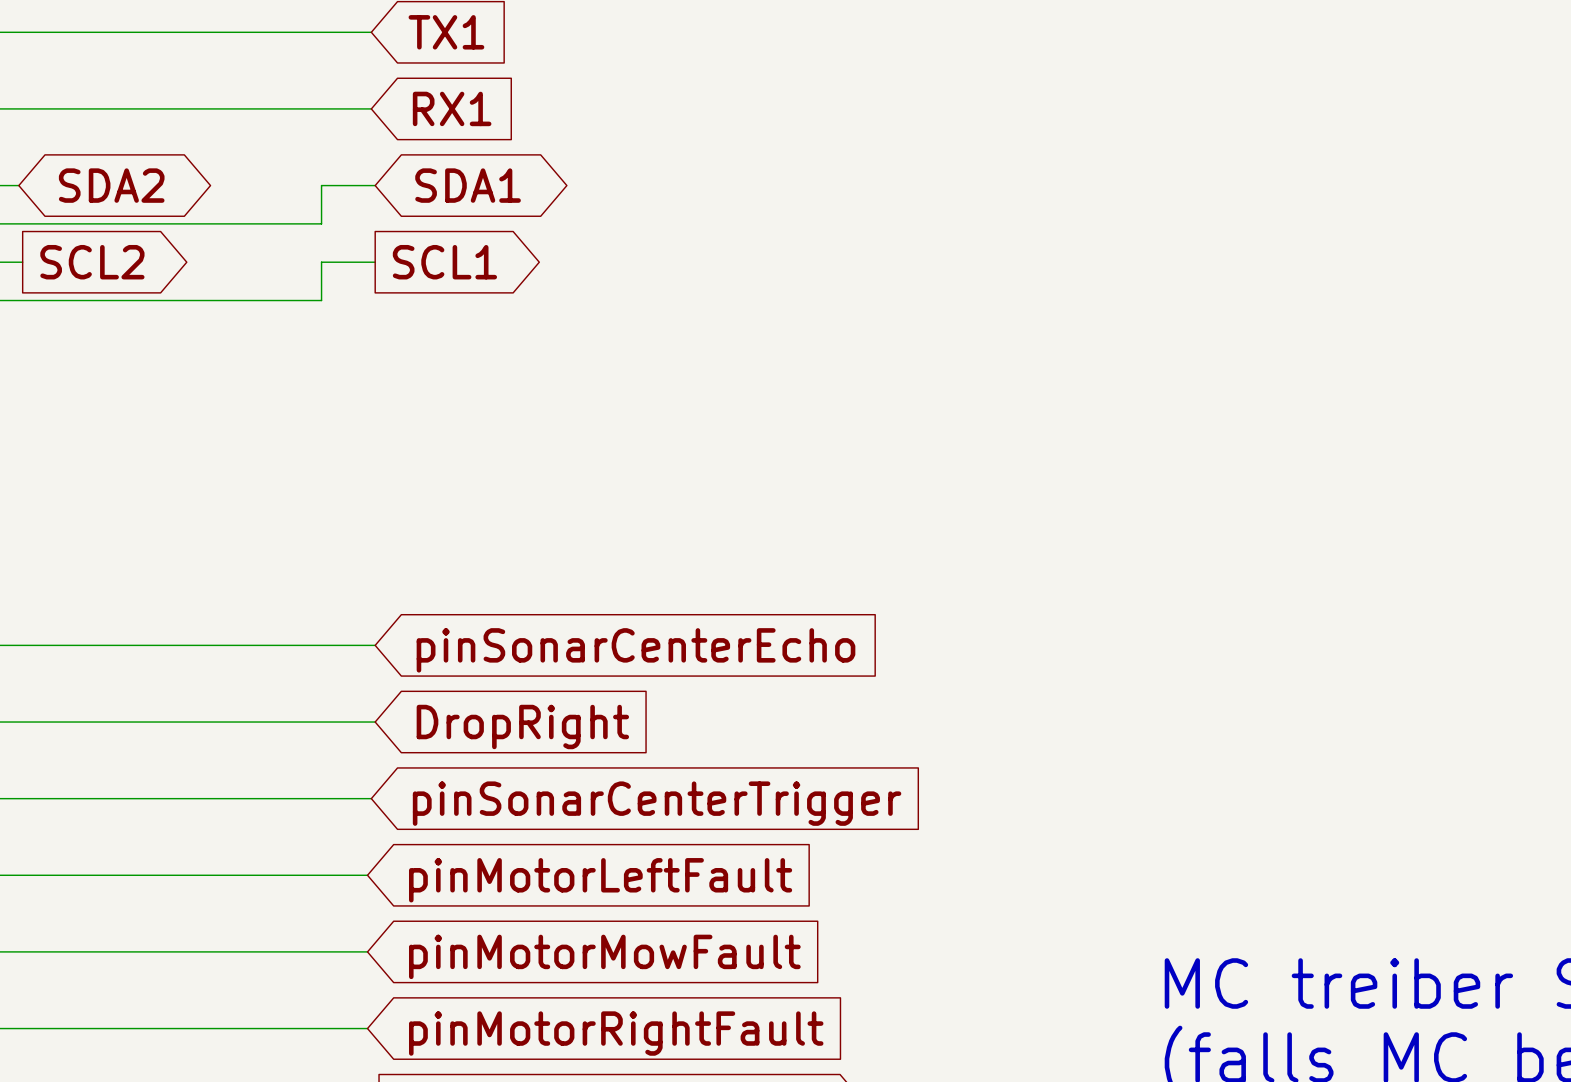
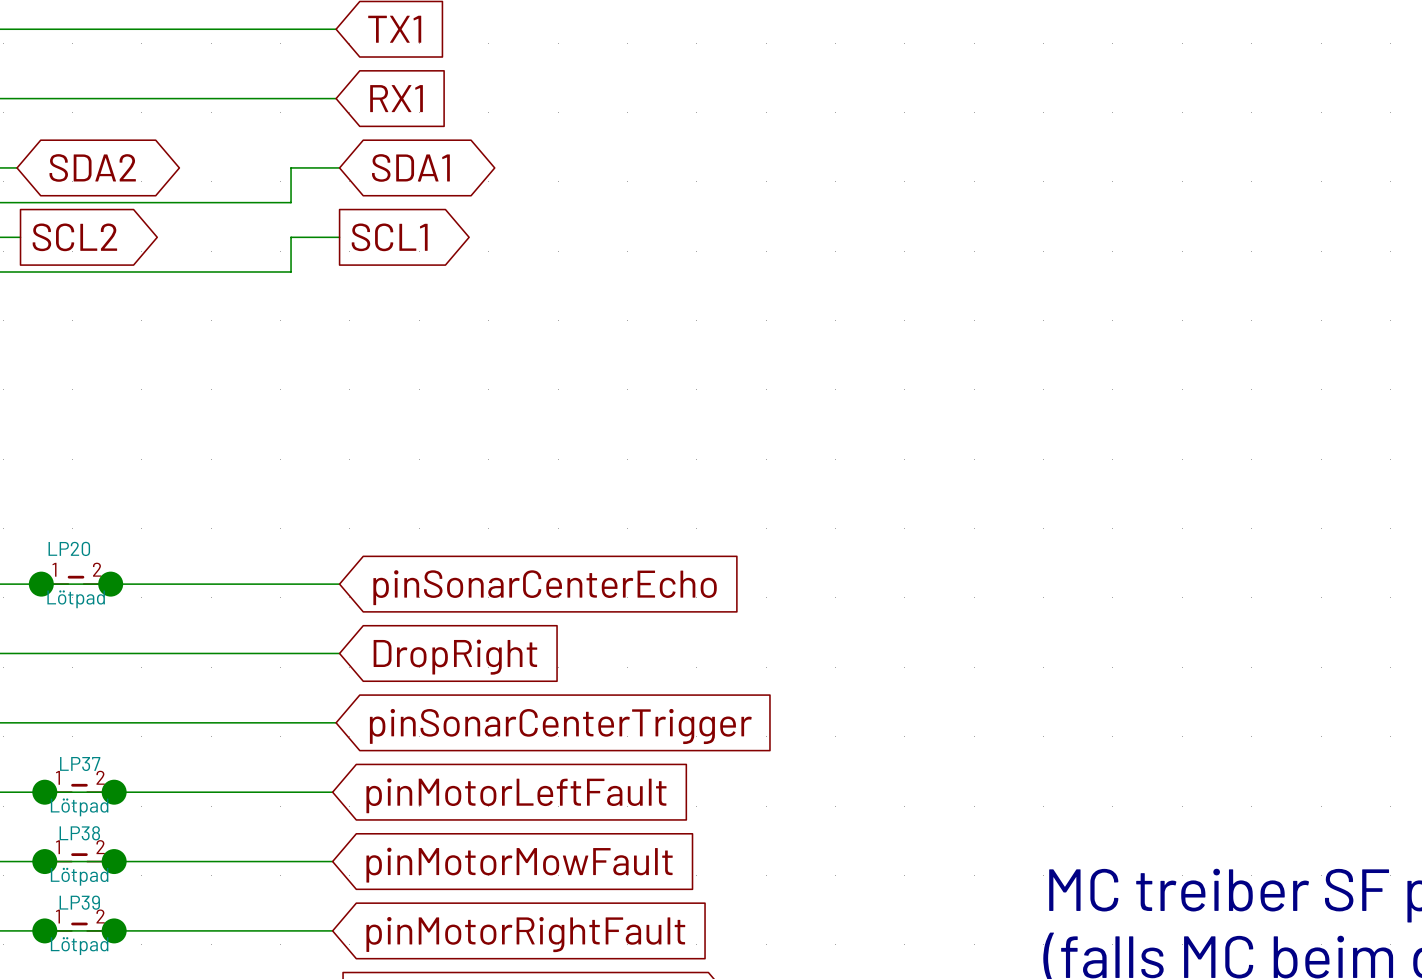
LP20: none -> Lötpad (76, 579)
junction: none -> (41, 584)
junction: none -> (110, 584)
LP37: none -> Lötpad (79, 788)
junction: none -> (44, 792)
junction: none -> (114, 792)
LP38: none -> Lötpad (79, 857)
junction: none -> (44, 861)
junction: none -> (114, 861)
LP39: none -> Lötpad (79, 926)
junction: none -> (44, 930)
junction: none -> (114, 930)

